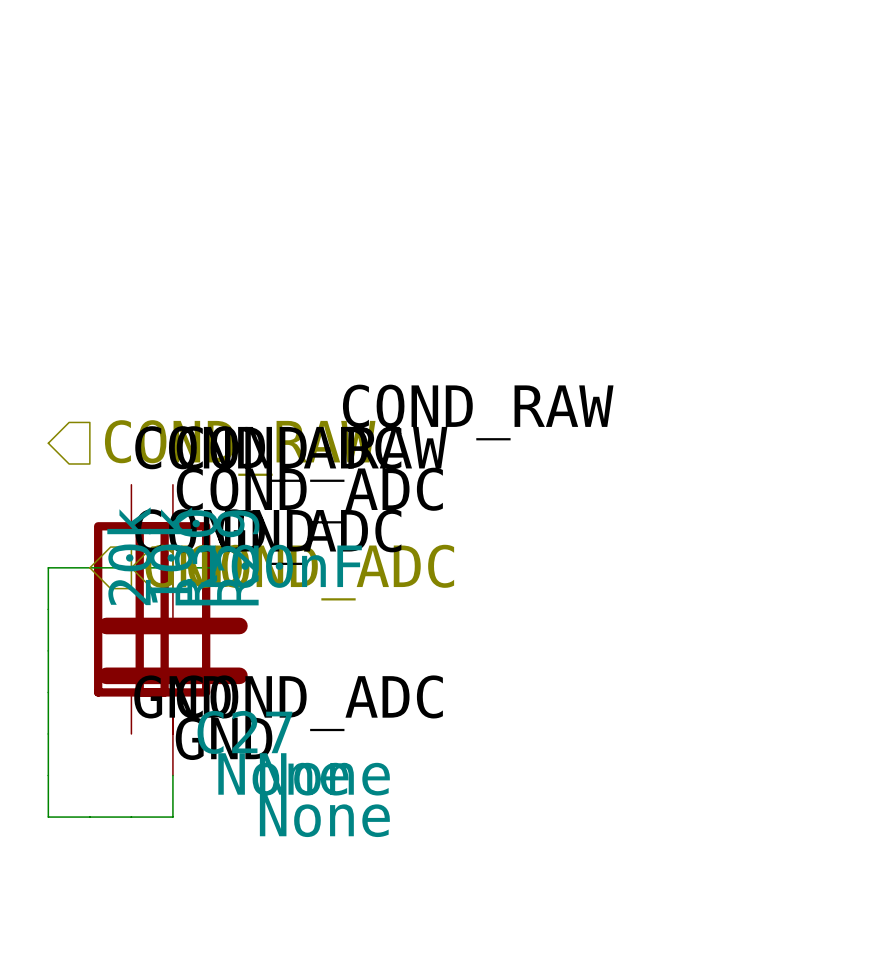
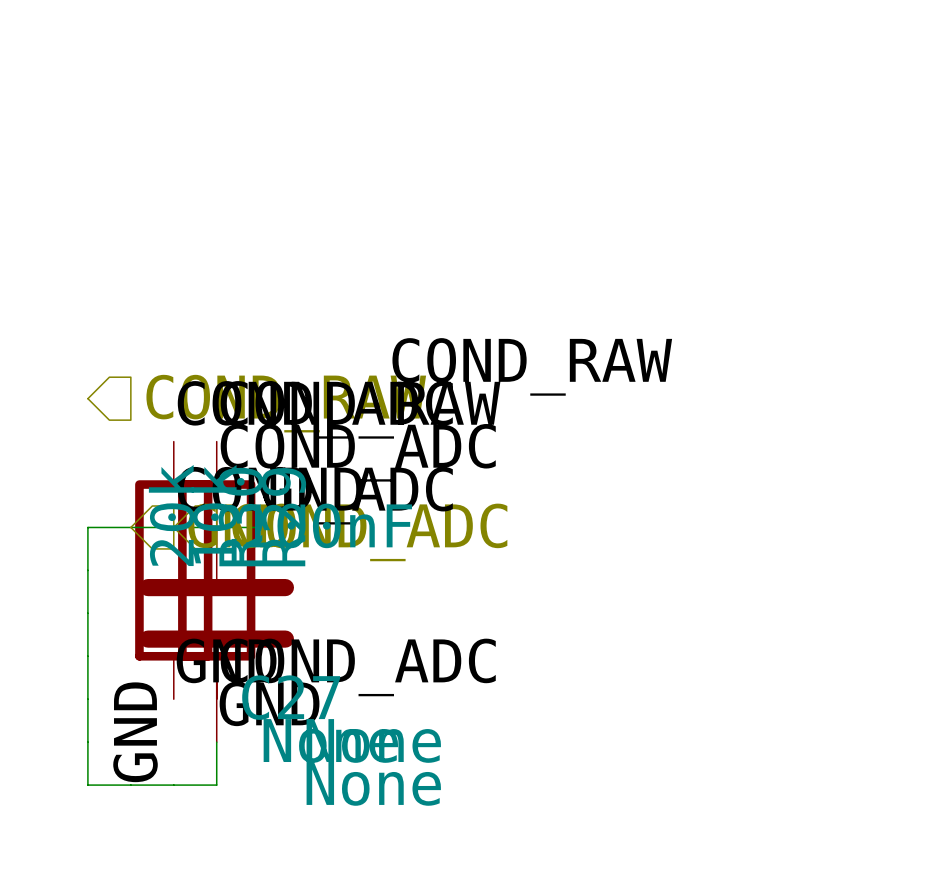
label: none -> GND (135, 732)

